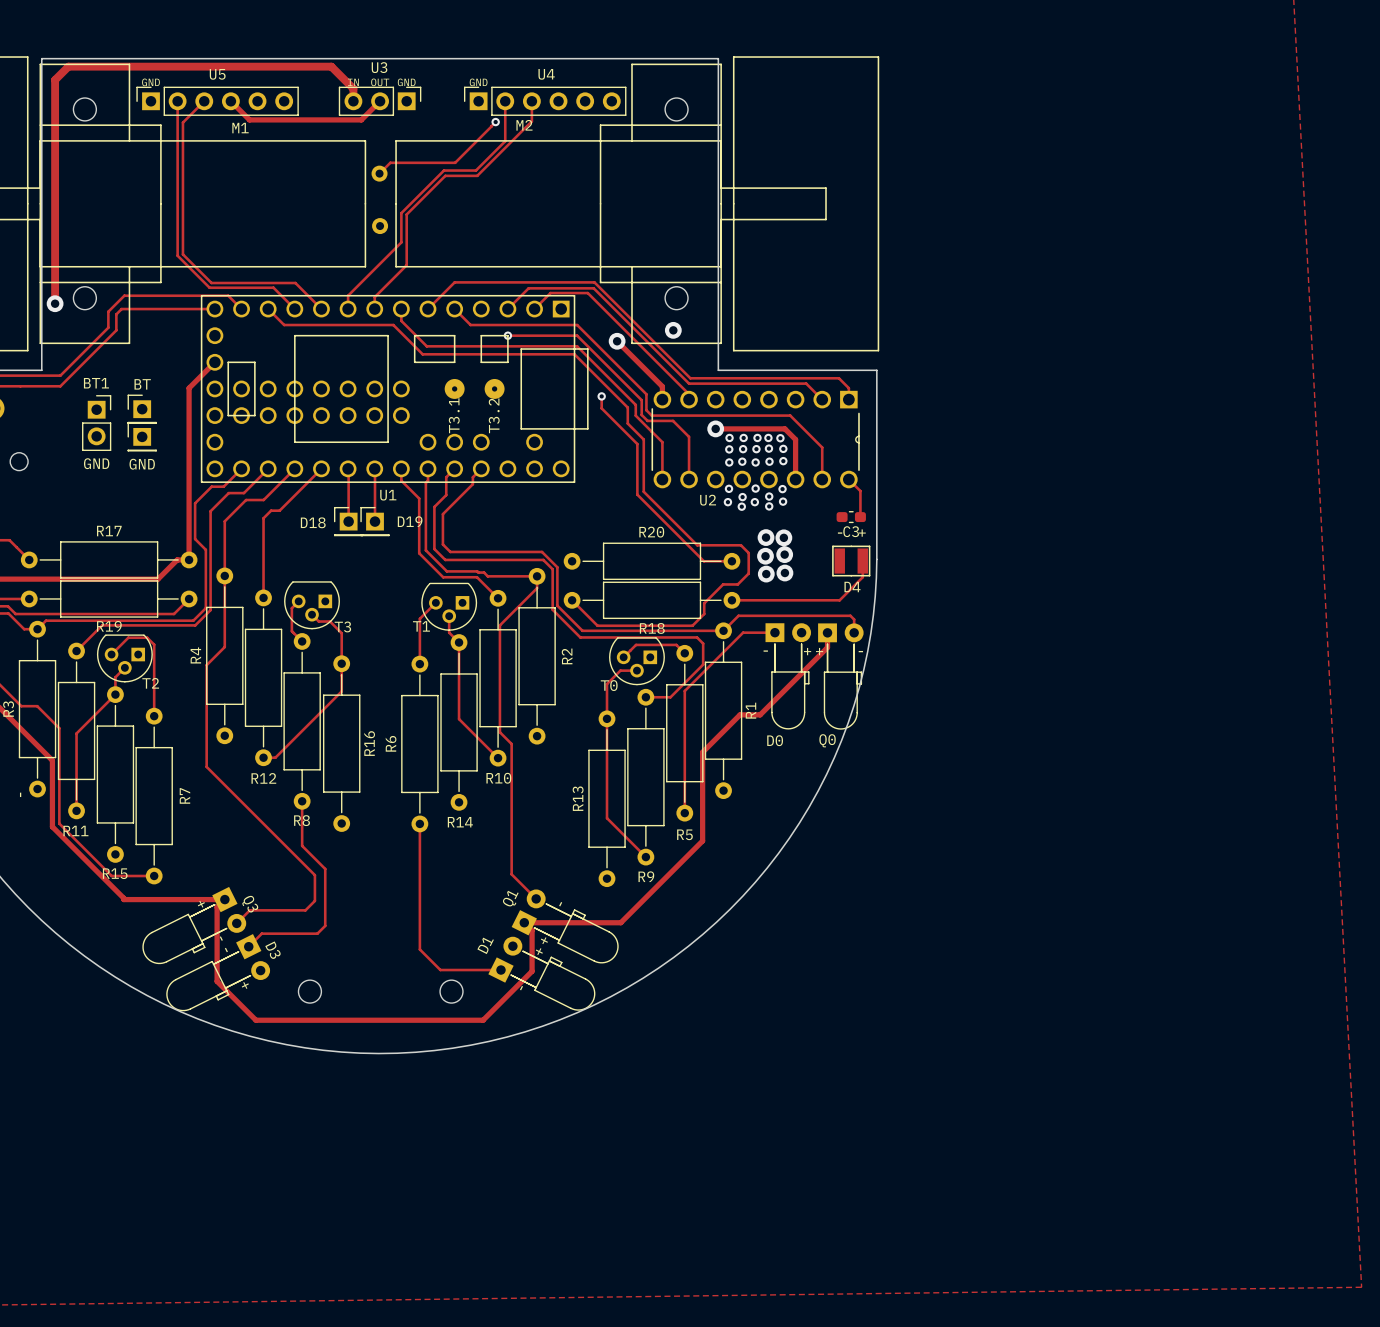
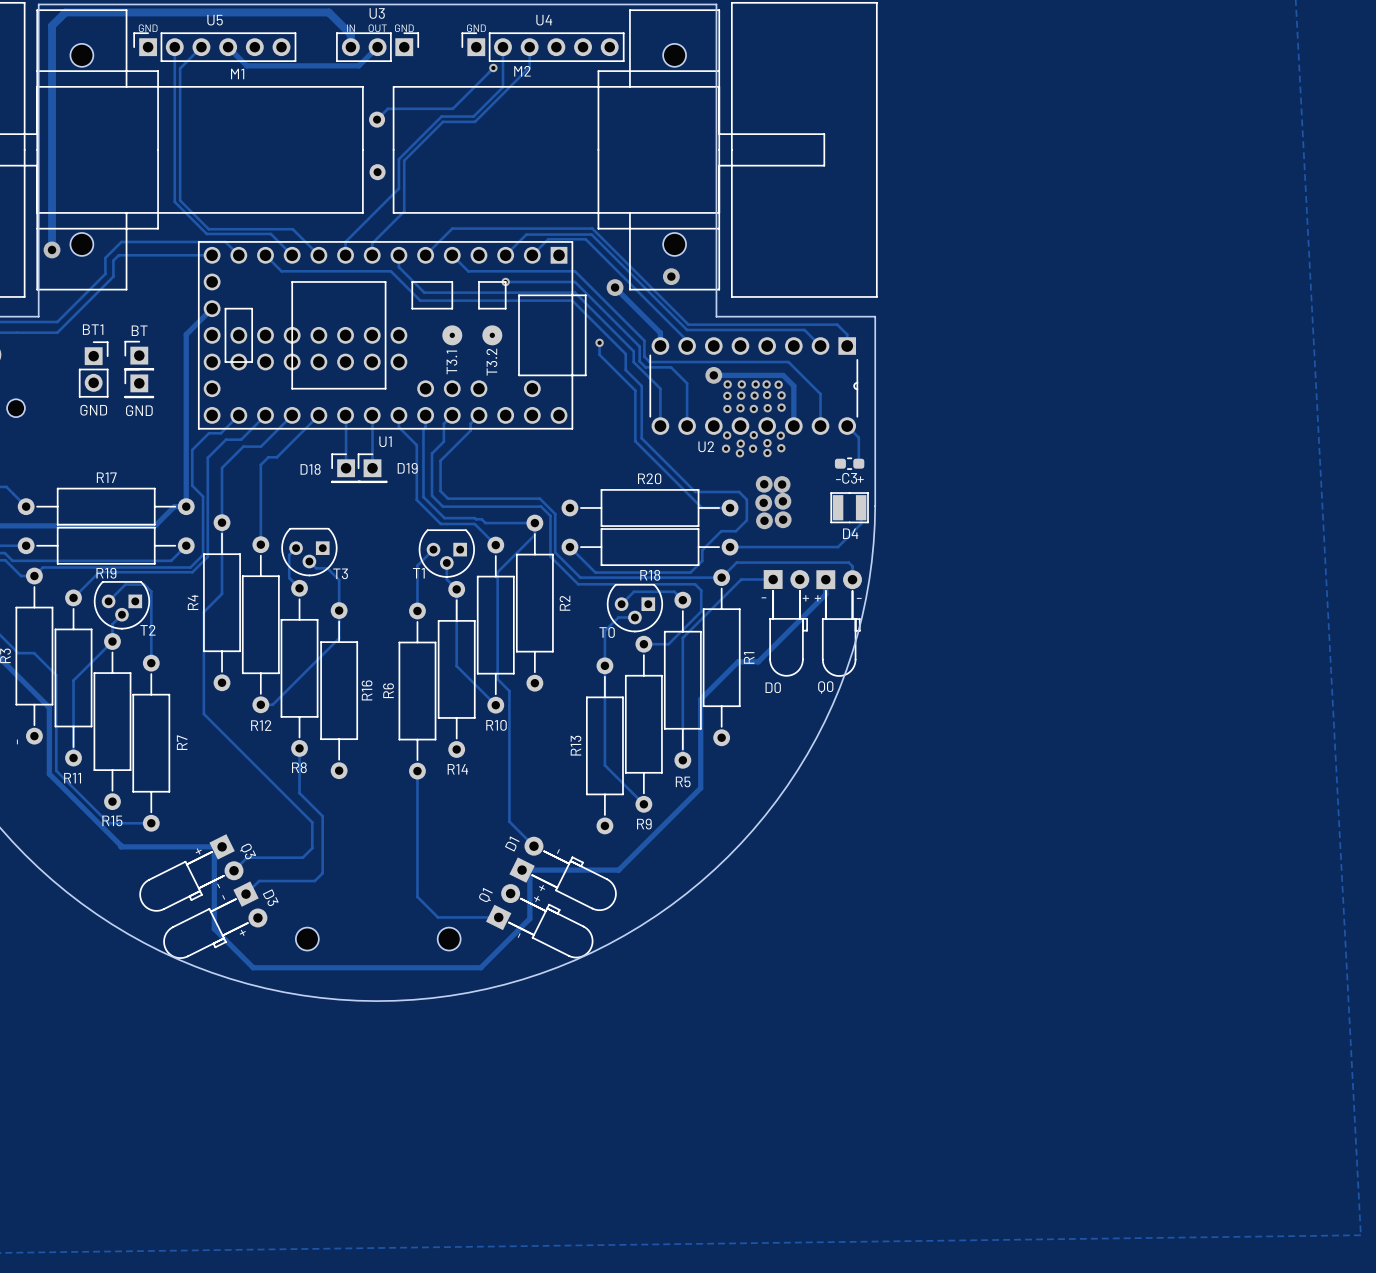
Q1 name position: Q1 (510, 898) -> Q1 (485, 895)
D1 name position: D1 (485, 945) -> D1 (512, 844)

